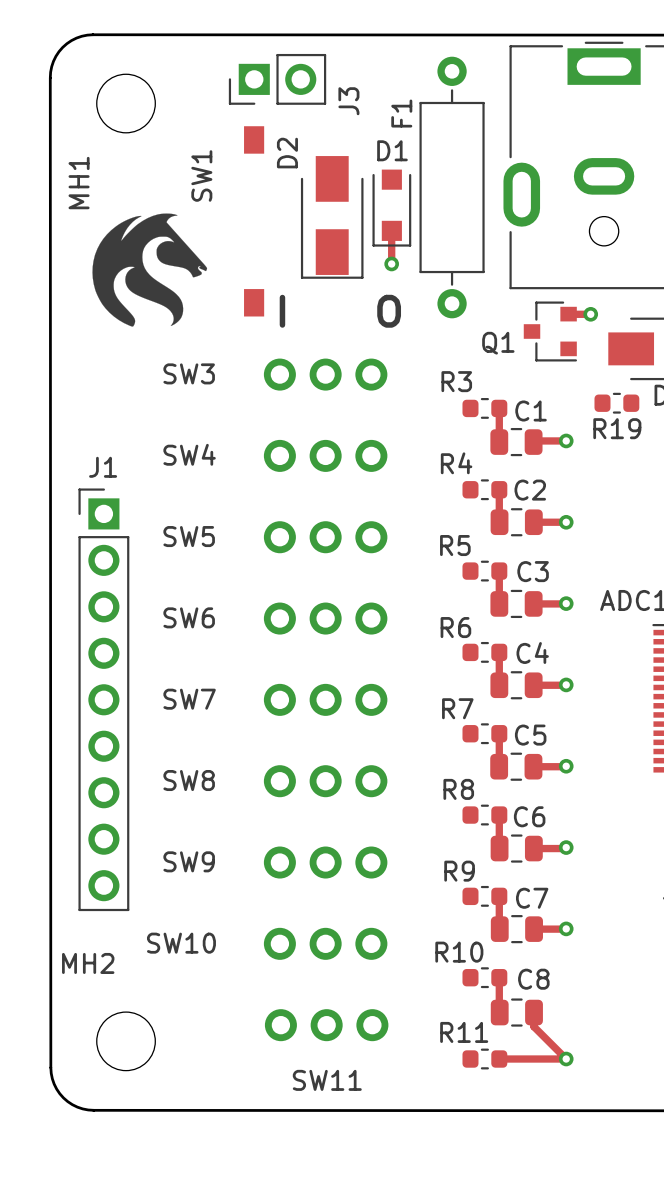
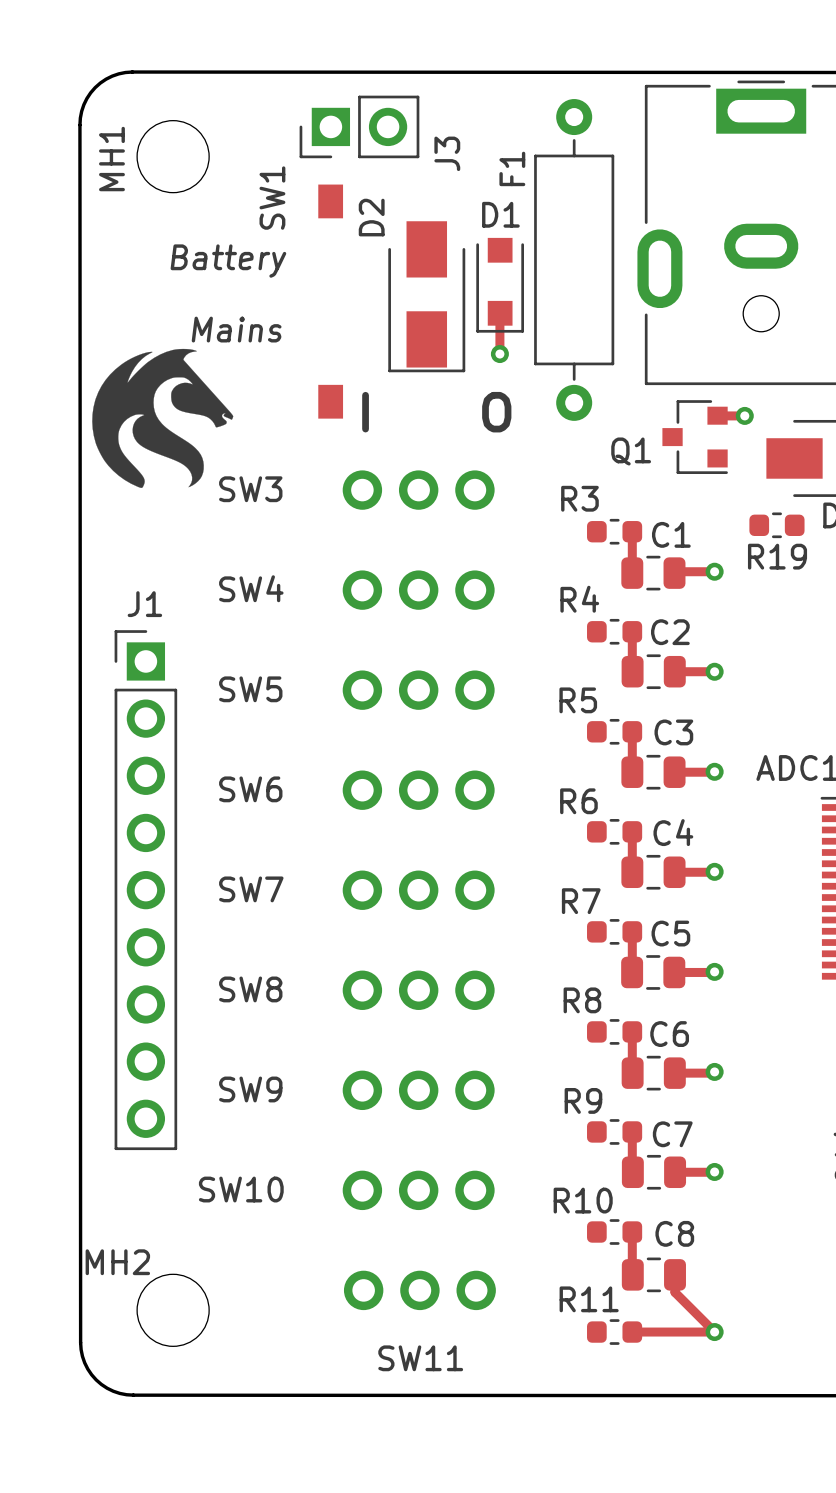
SW1 name position: SW1 (201, 175) -> SW1 (272, 198)
MH1 name position: MH1 (79, 183) -> MH1 (111, 159)
text: none -> Battery (228, 261)
text: none -> Mains (236, 329)
drawing position: (149, 270) -> (162, 418)
MH2 name position: MH2 (88, 963) -> MH2 (117, 1262)

